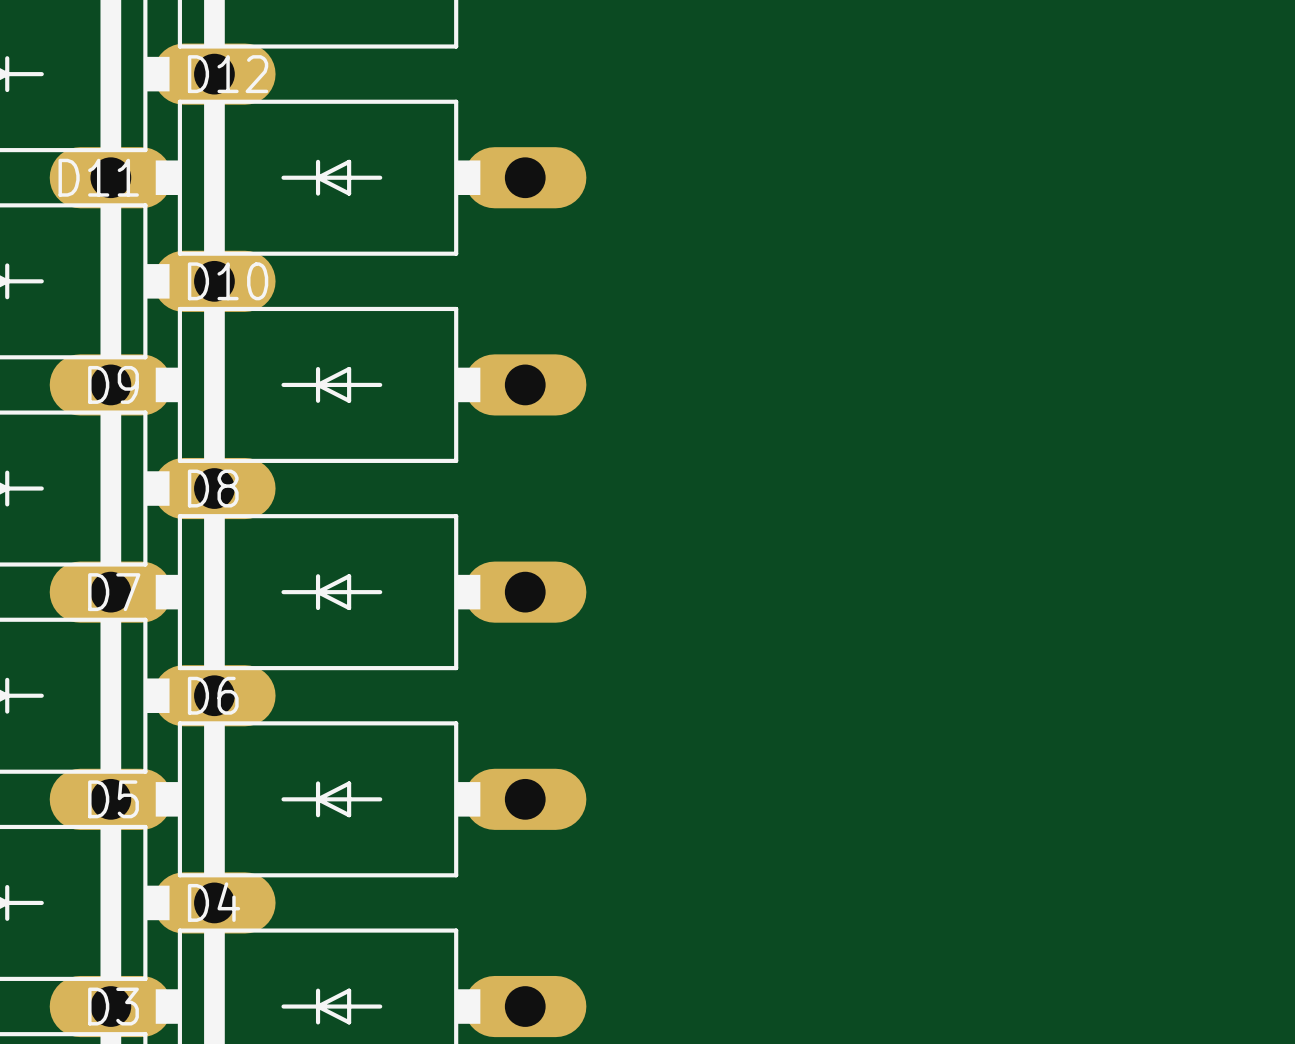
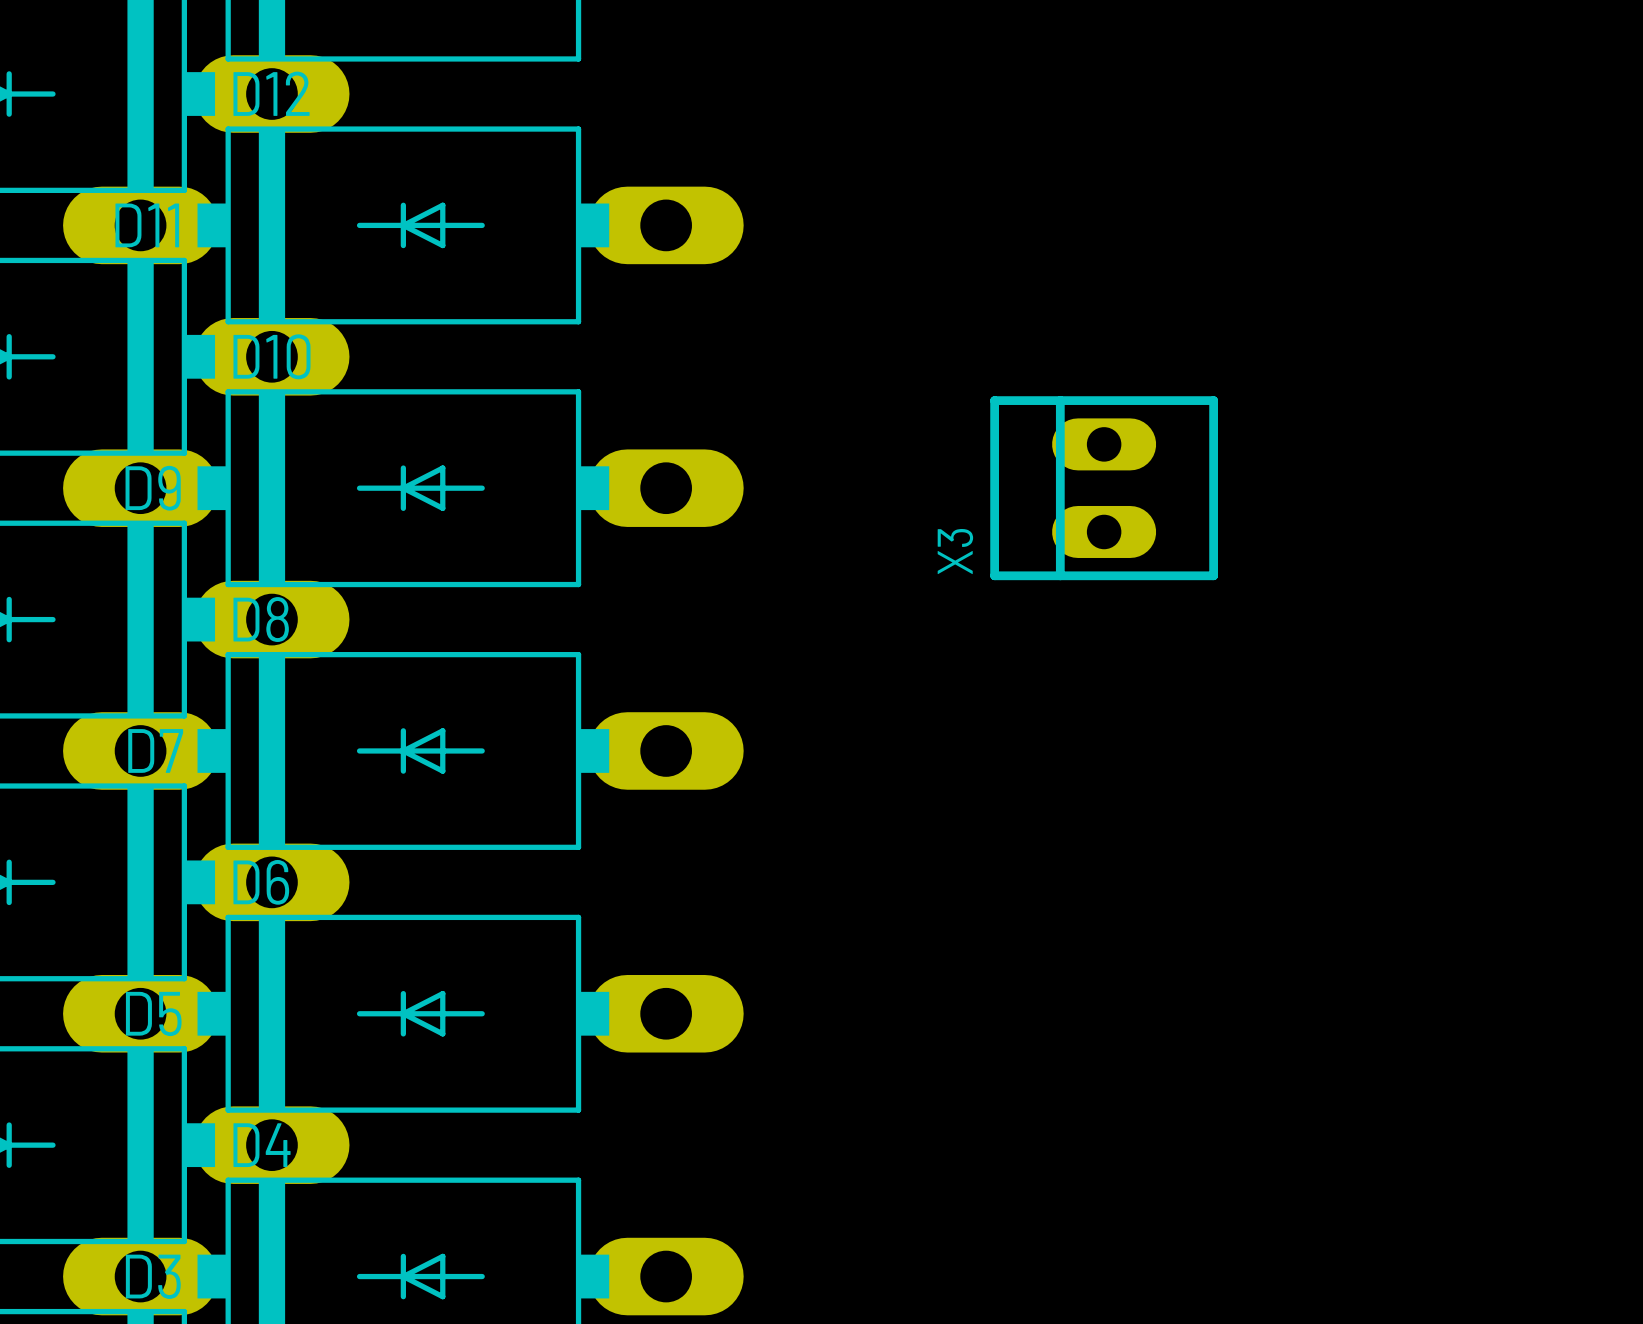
X3: none -> (1104, 488)

